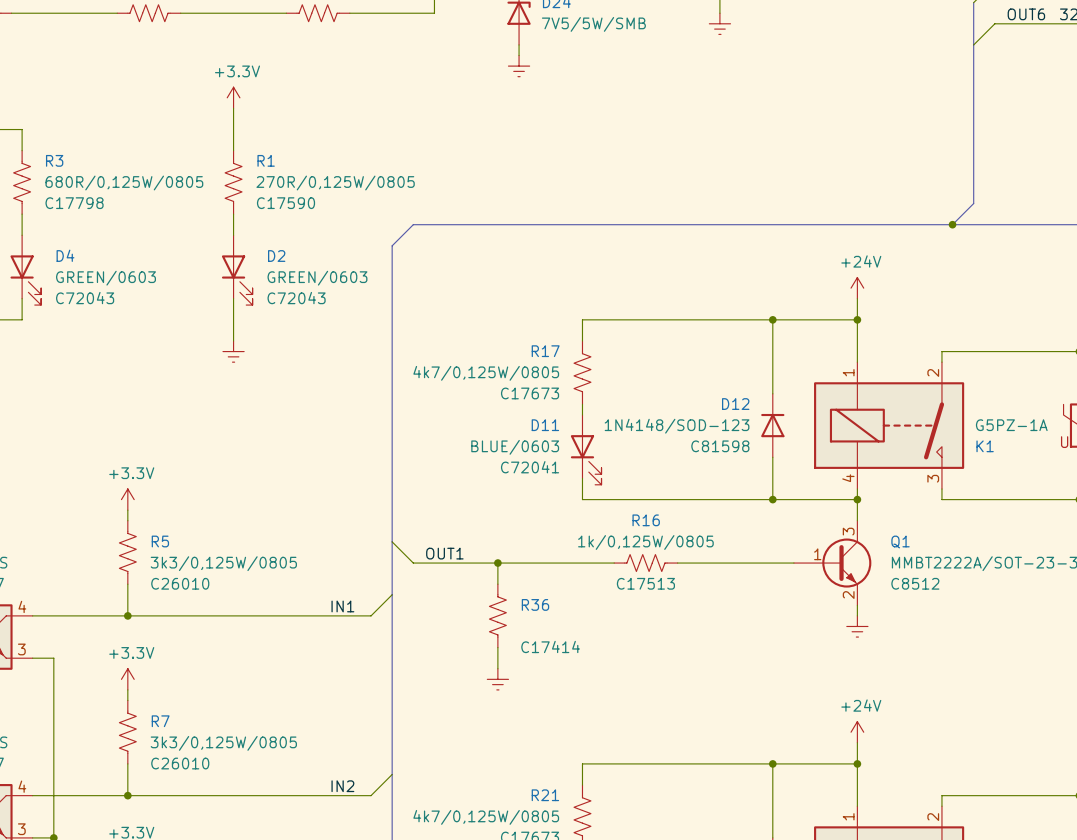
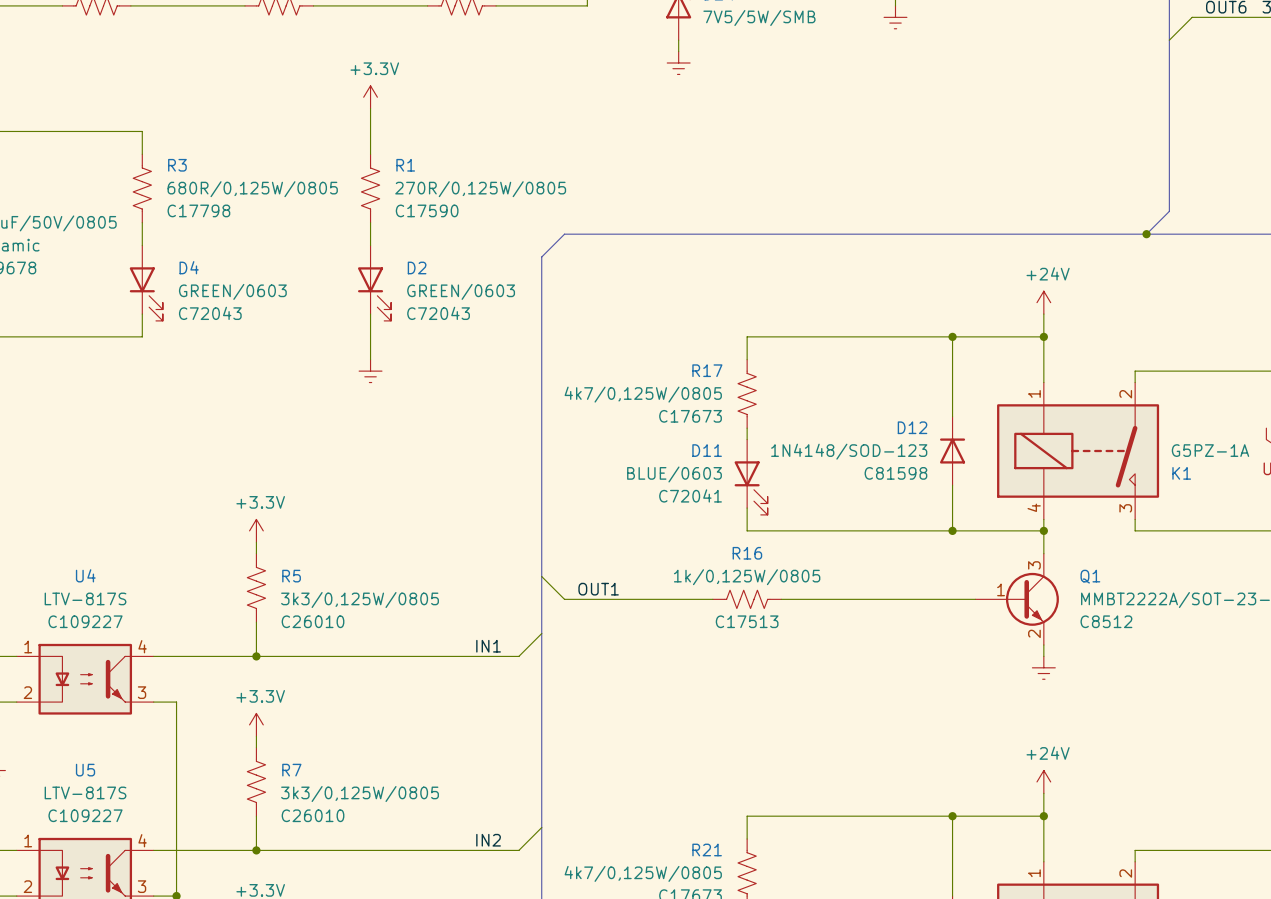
wire: (497, 563) (497, 584) -> none
junction: (497, 563) -> none
R16 position: (645, 563) -> (747, 599)
R36: (497, 615) -> none
wire: (497, 647) (497, 668) -> none
power symbol: (497, 679) -> none

